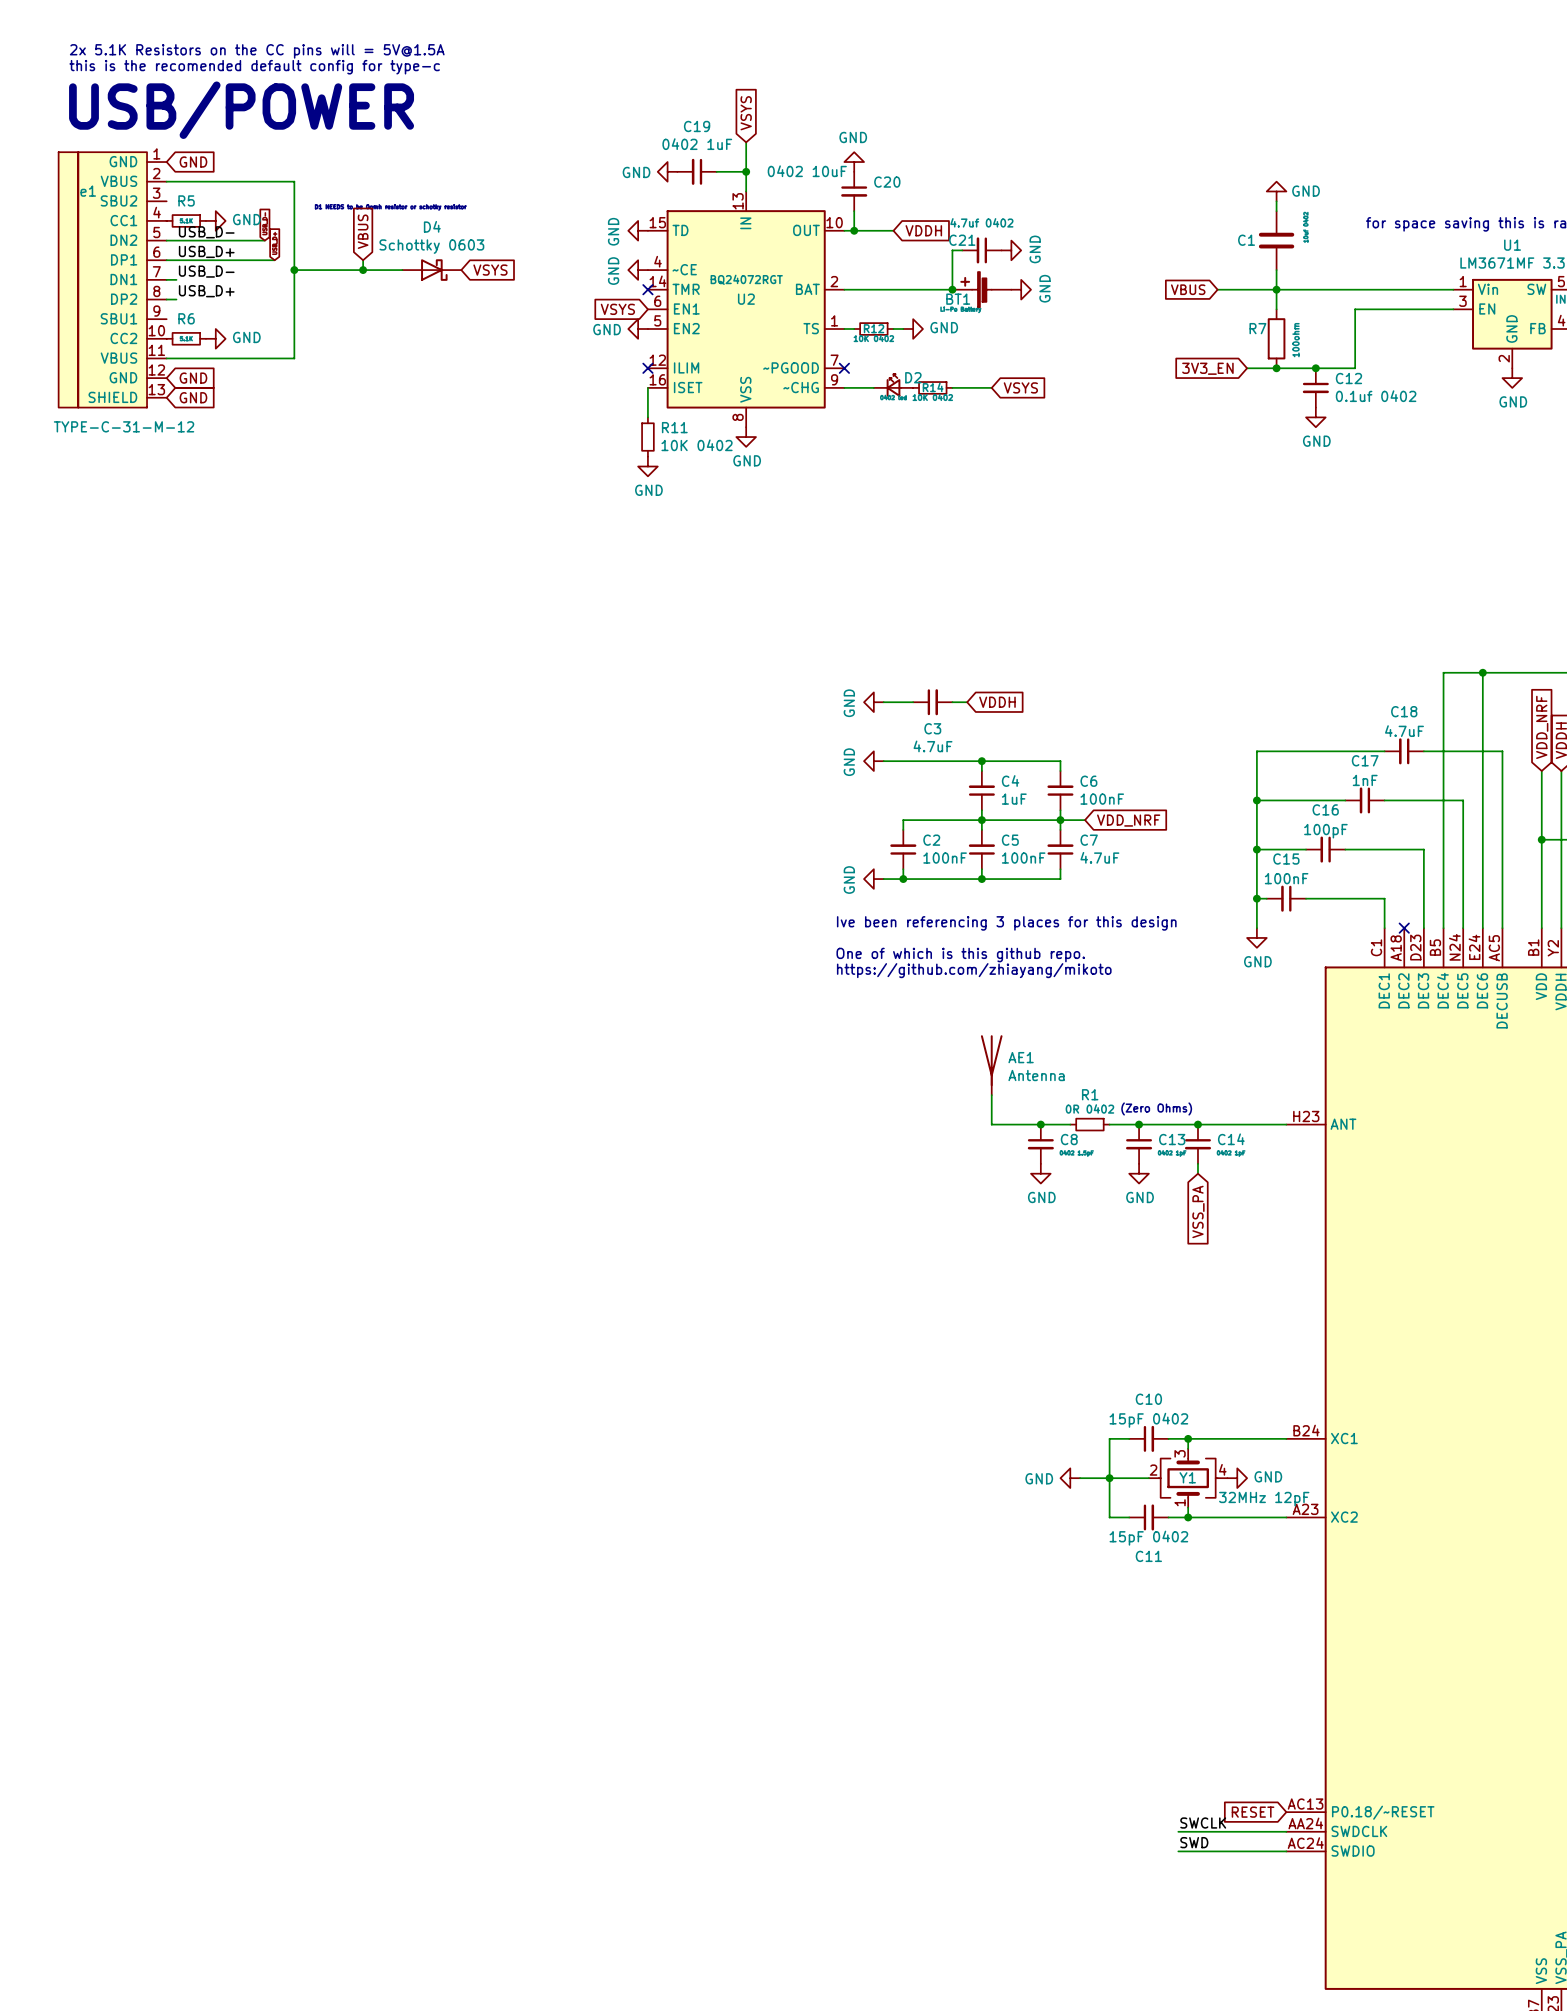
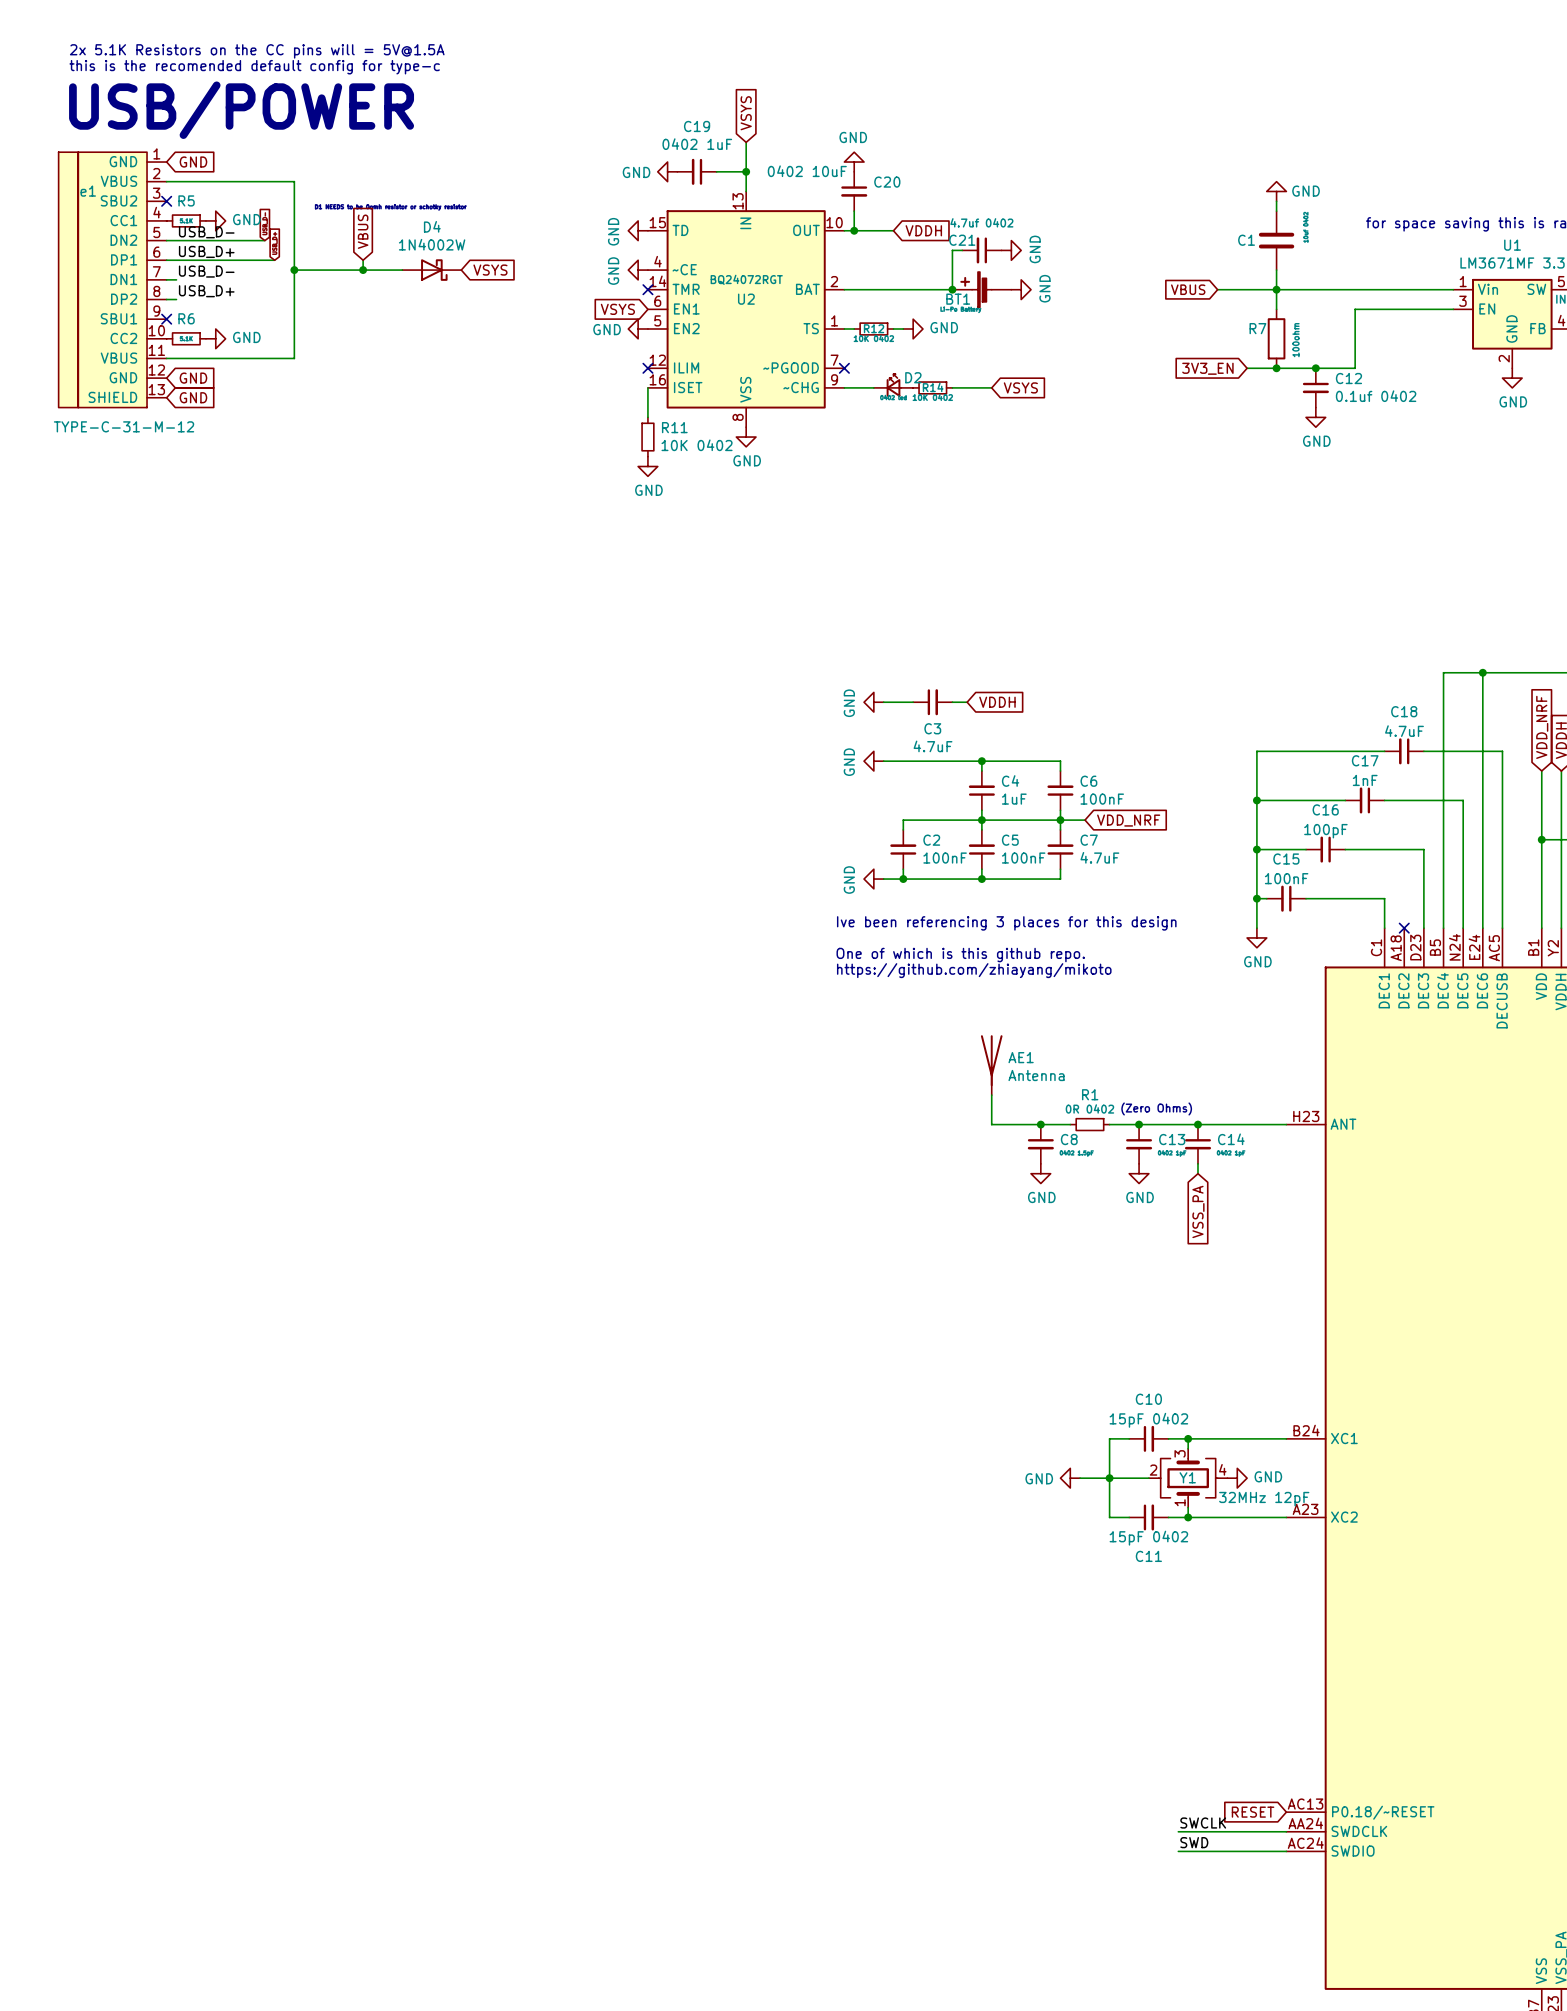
no-connect mark: none -> (166, 201)
D4 value: Schottky 0603 (431, 246) -> 1N4002W (432, 244)
no-connect mark: none -> (166, 319)

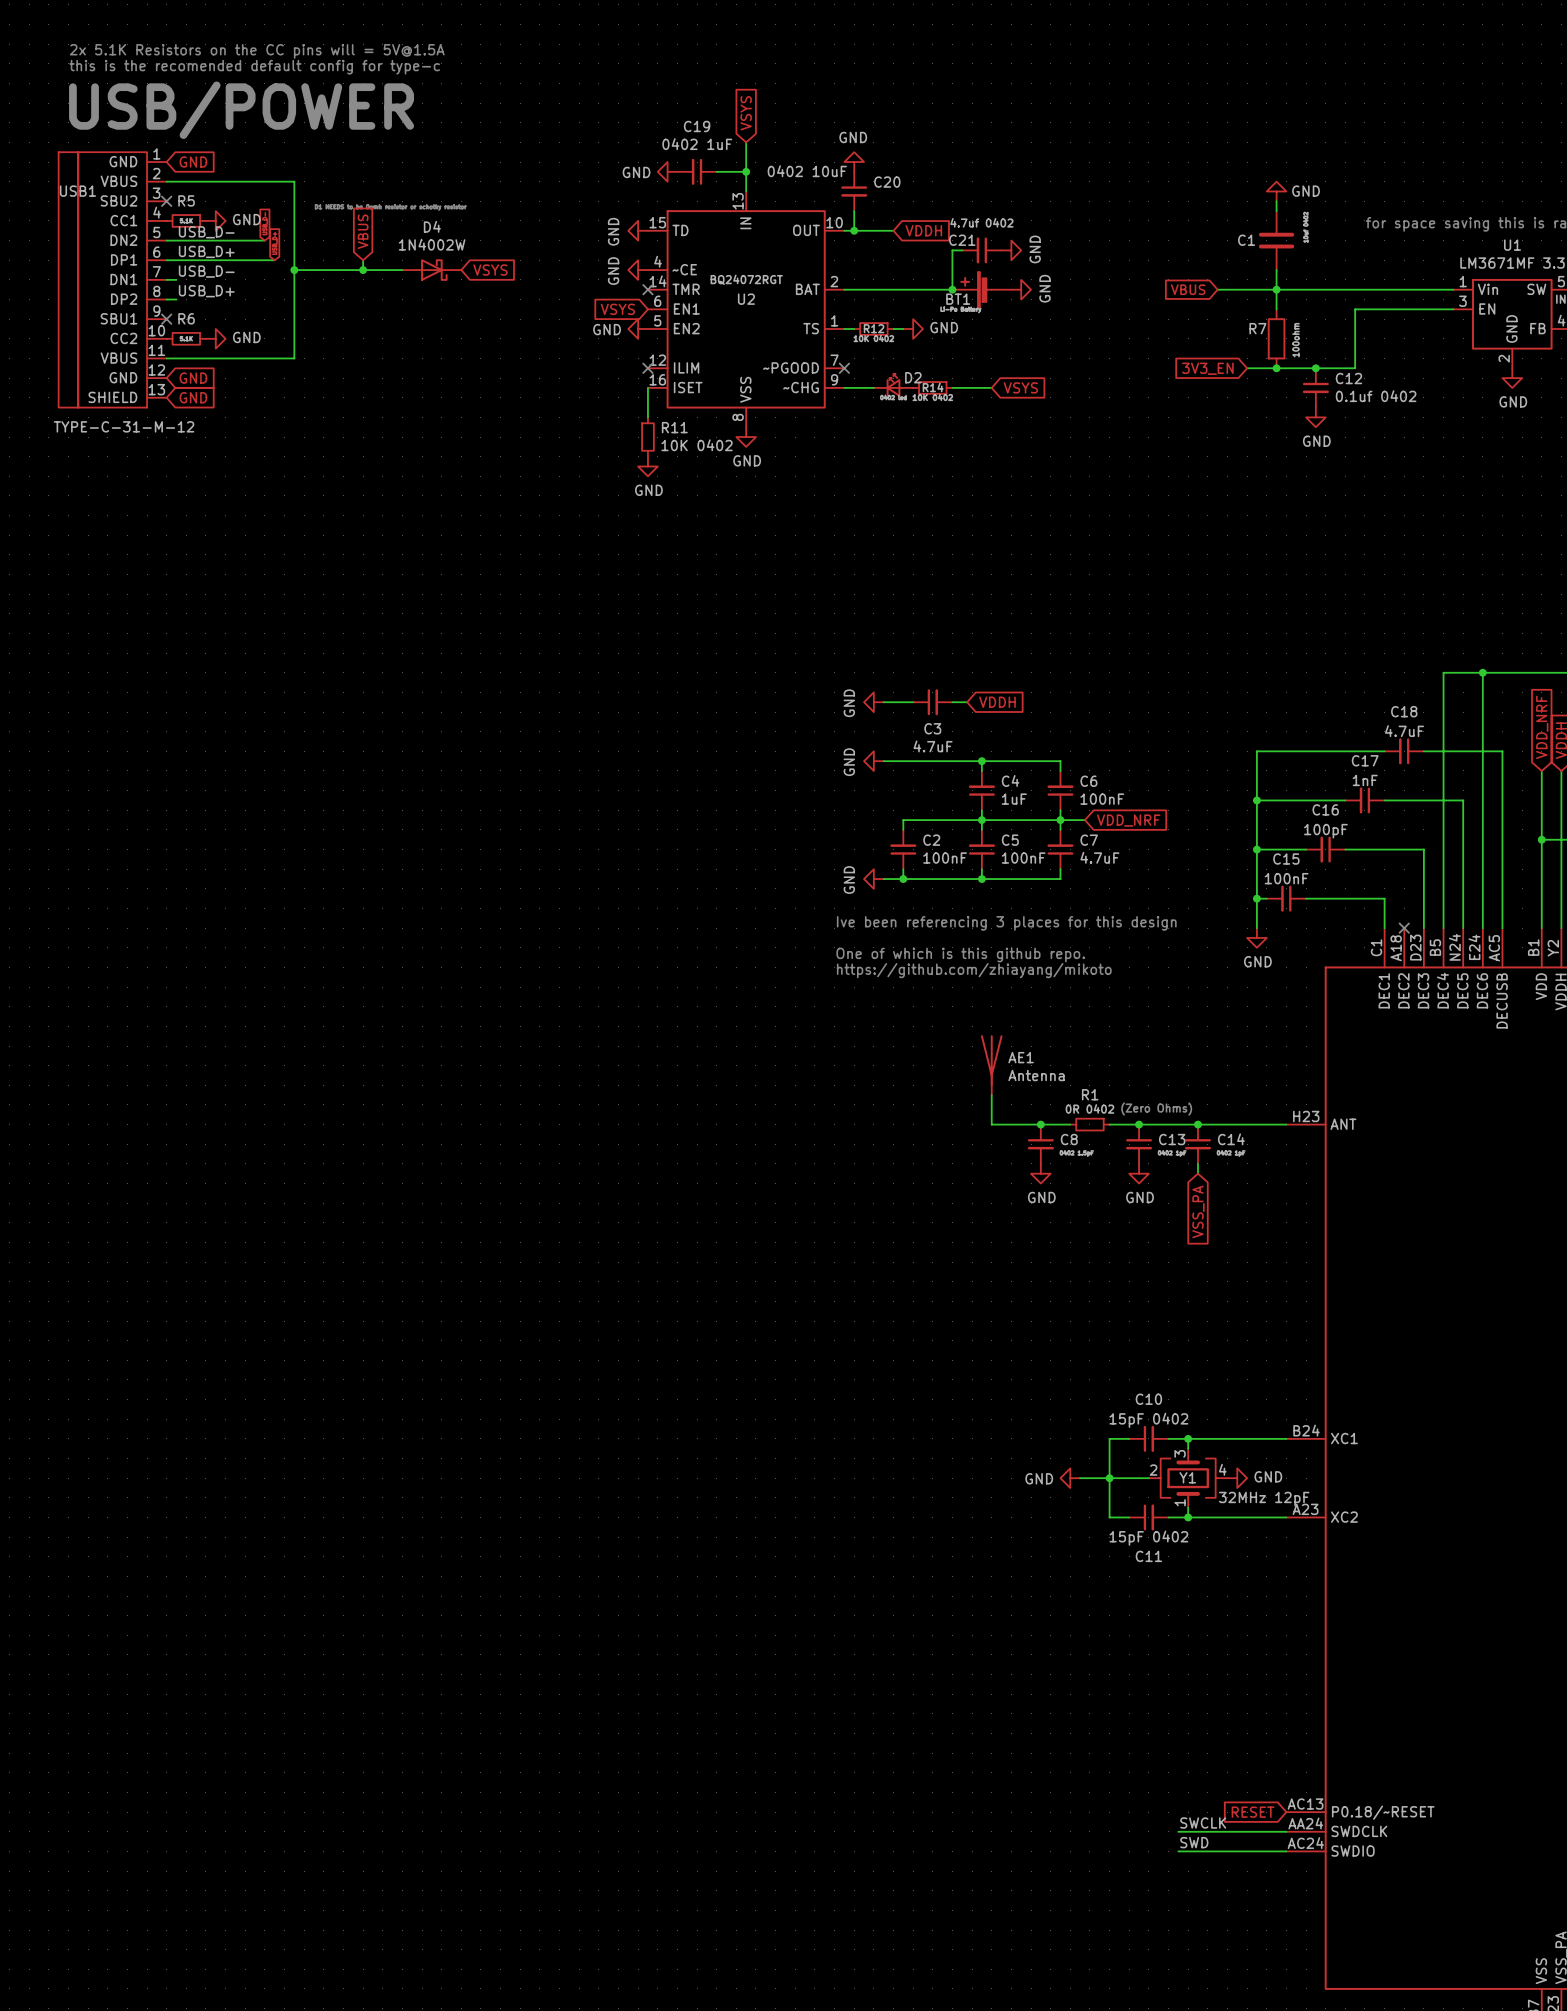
e1 name: e1 (88, 191) -> USB1 (77, 191)

